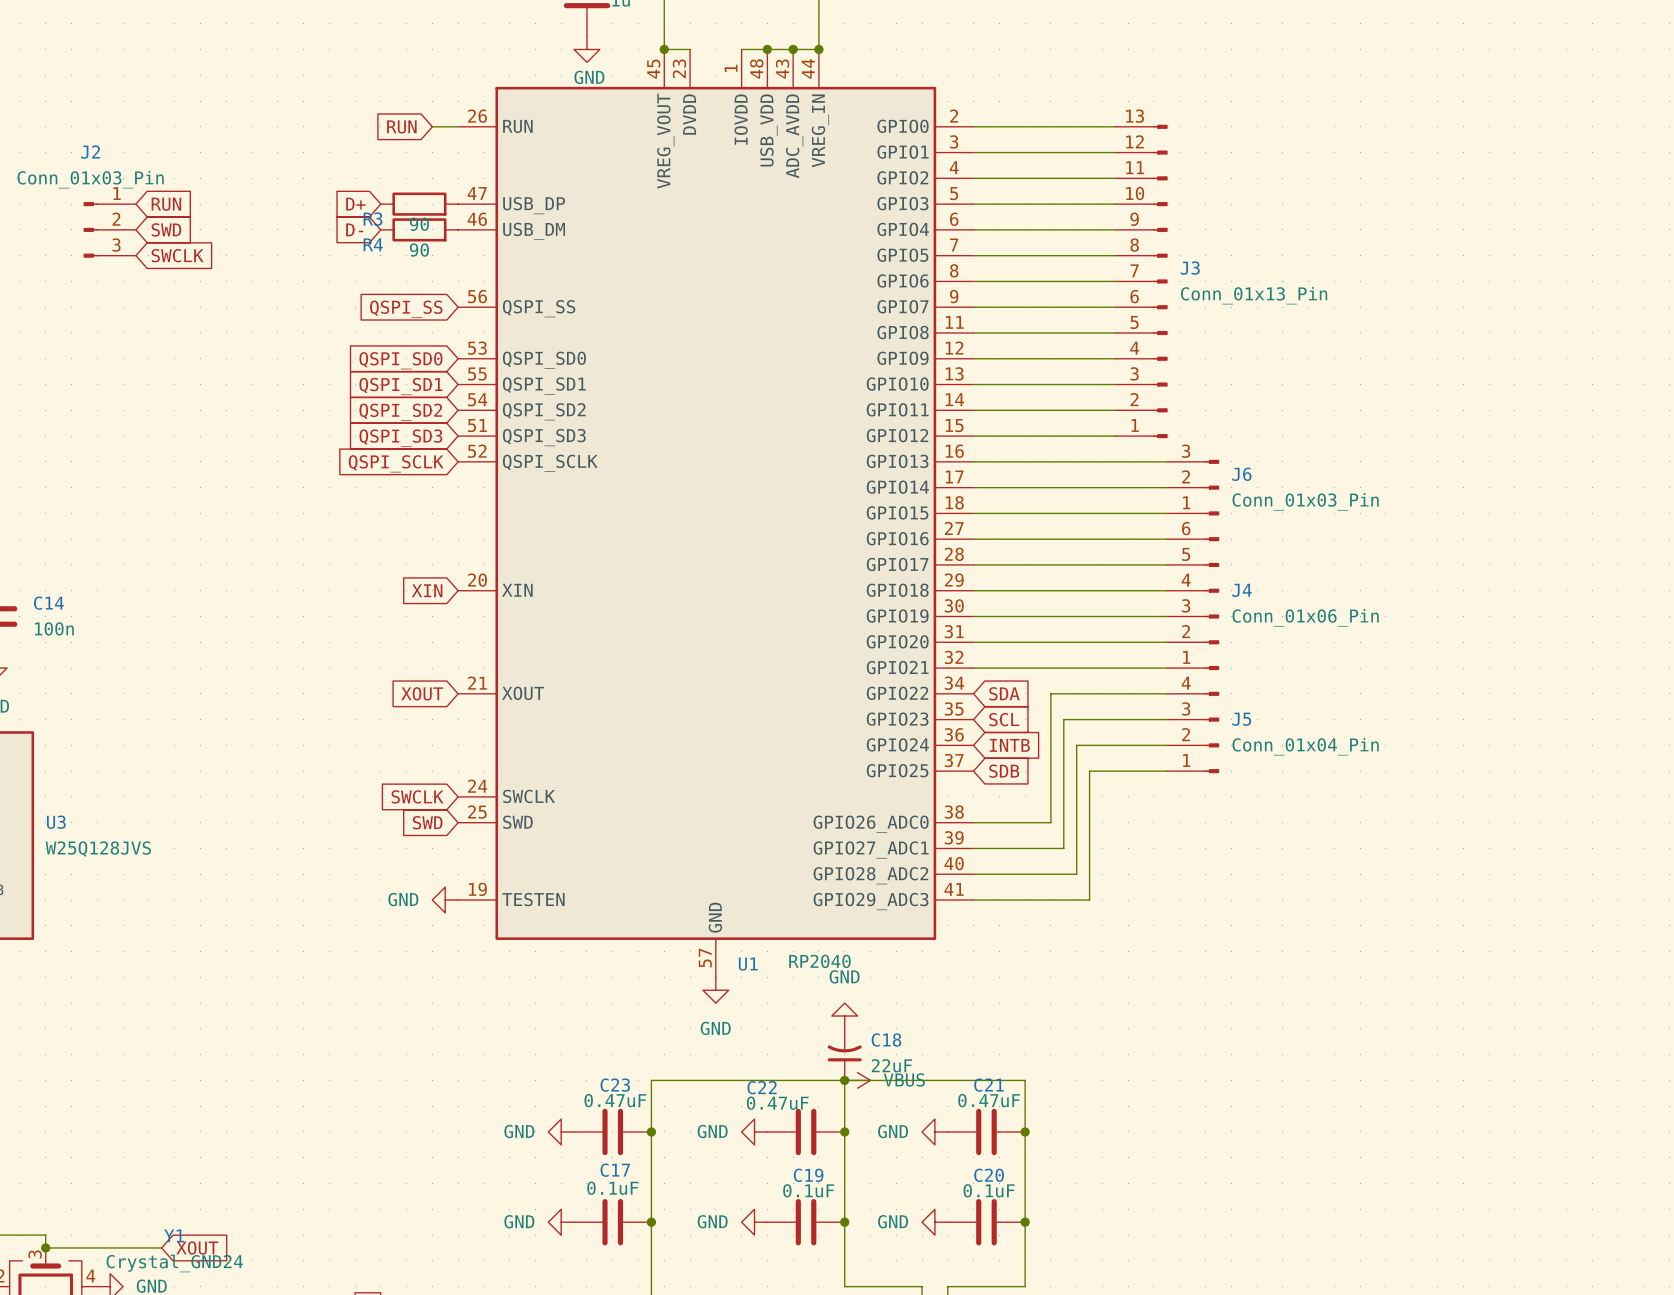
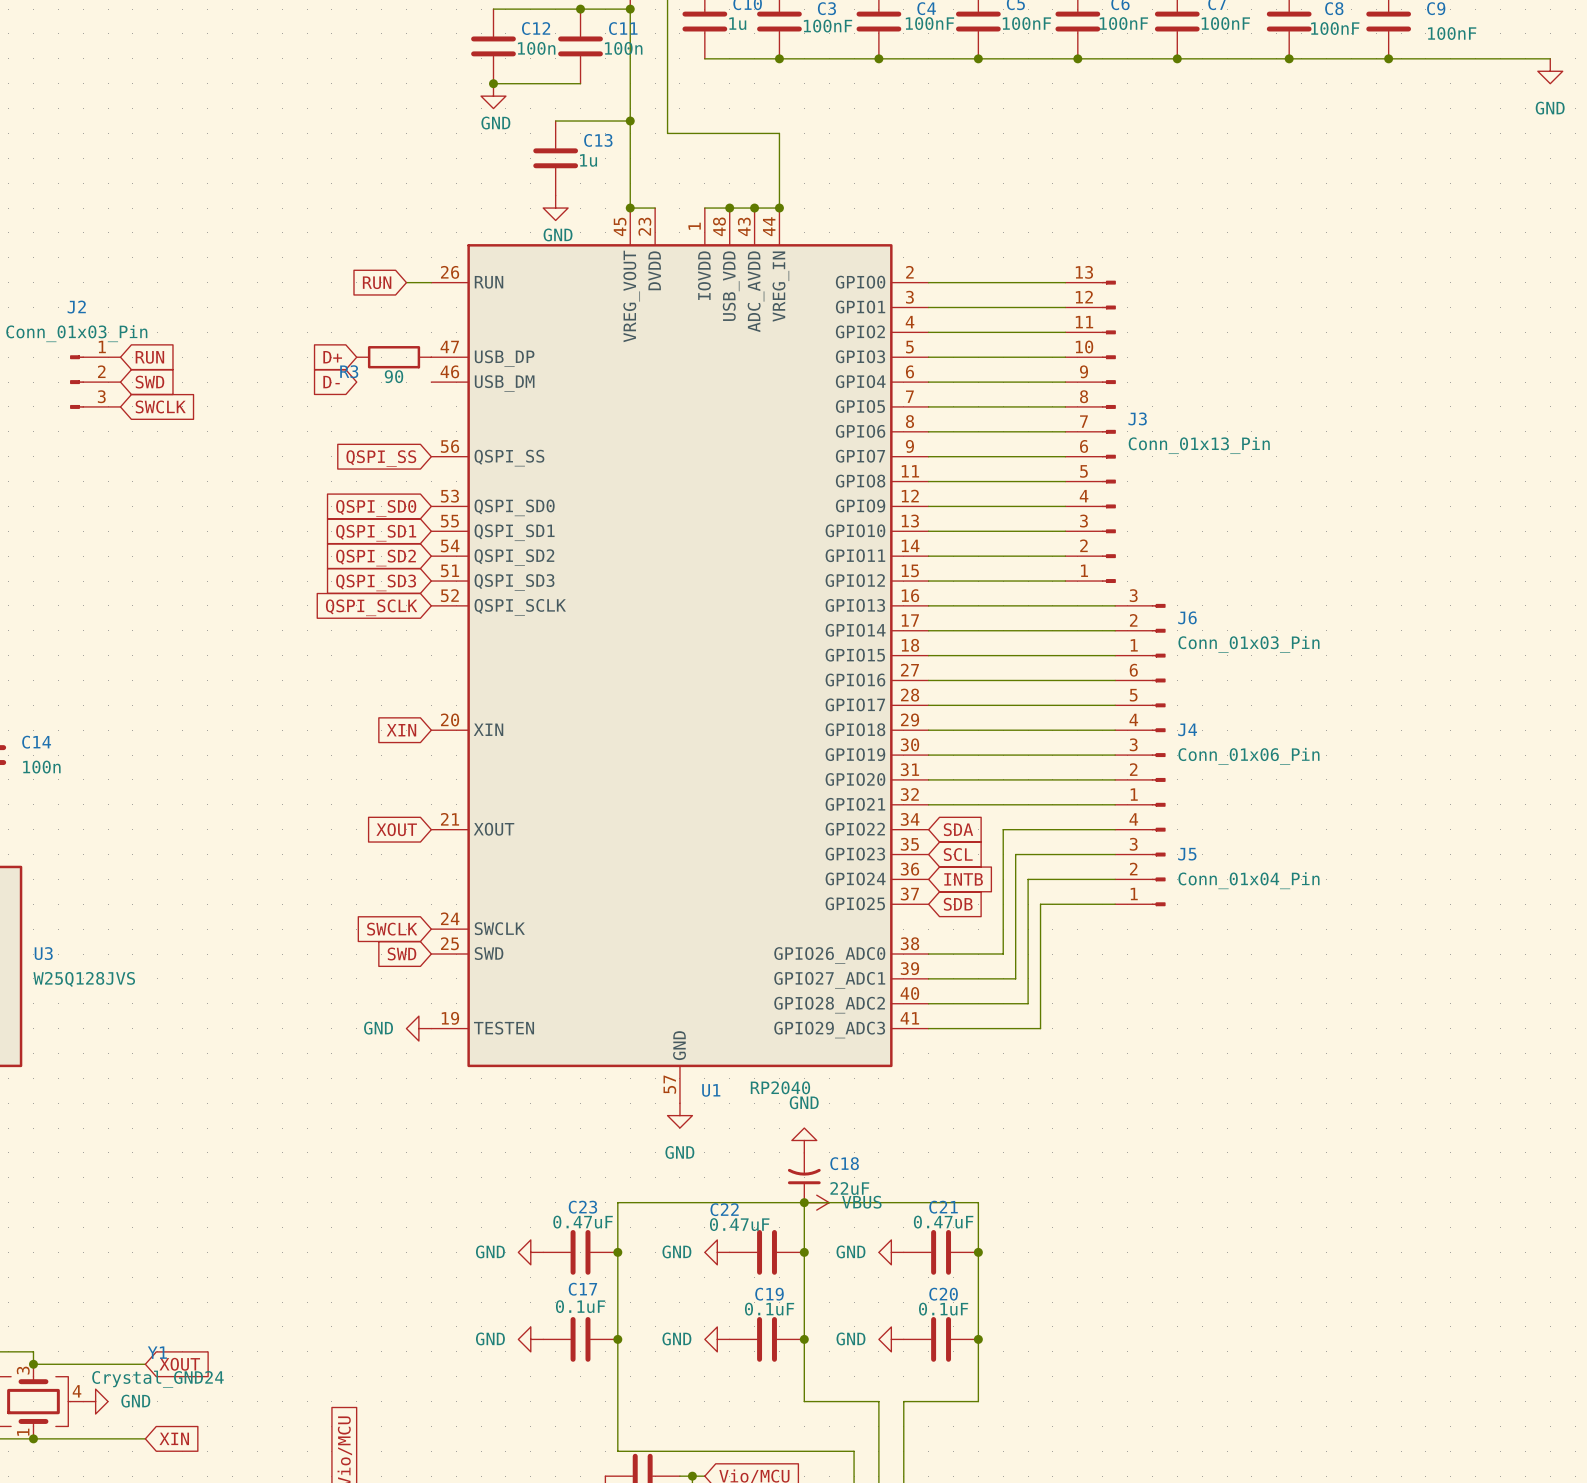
R4: 90 (419, 229) -> none

